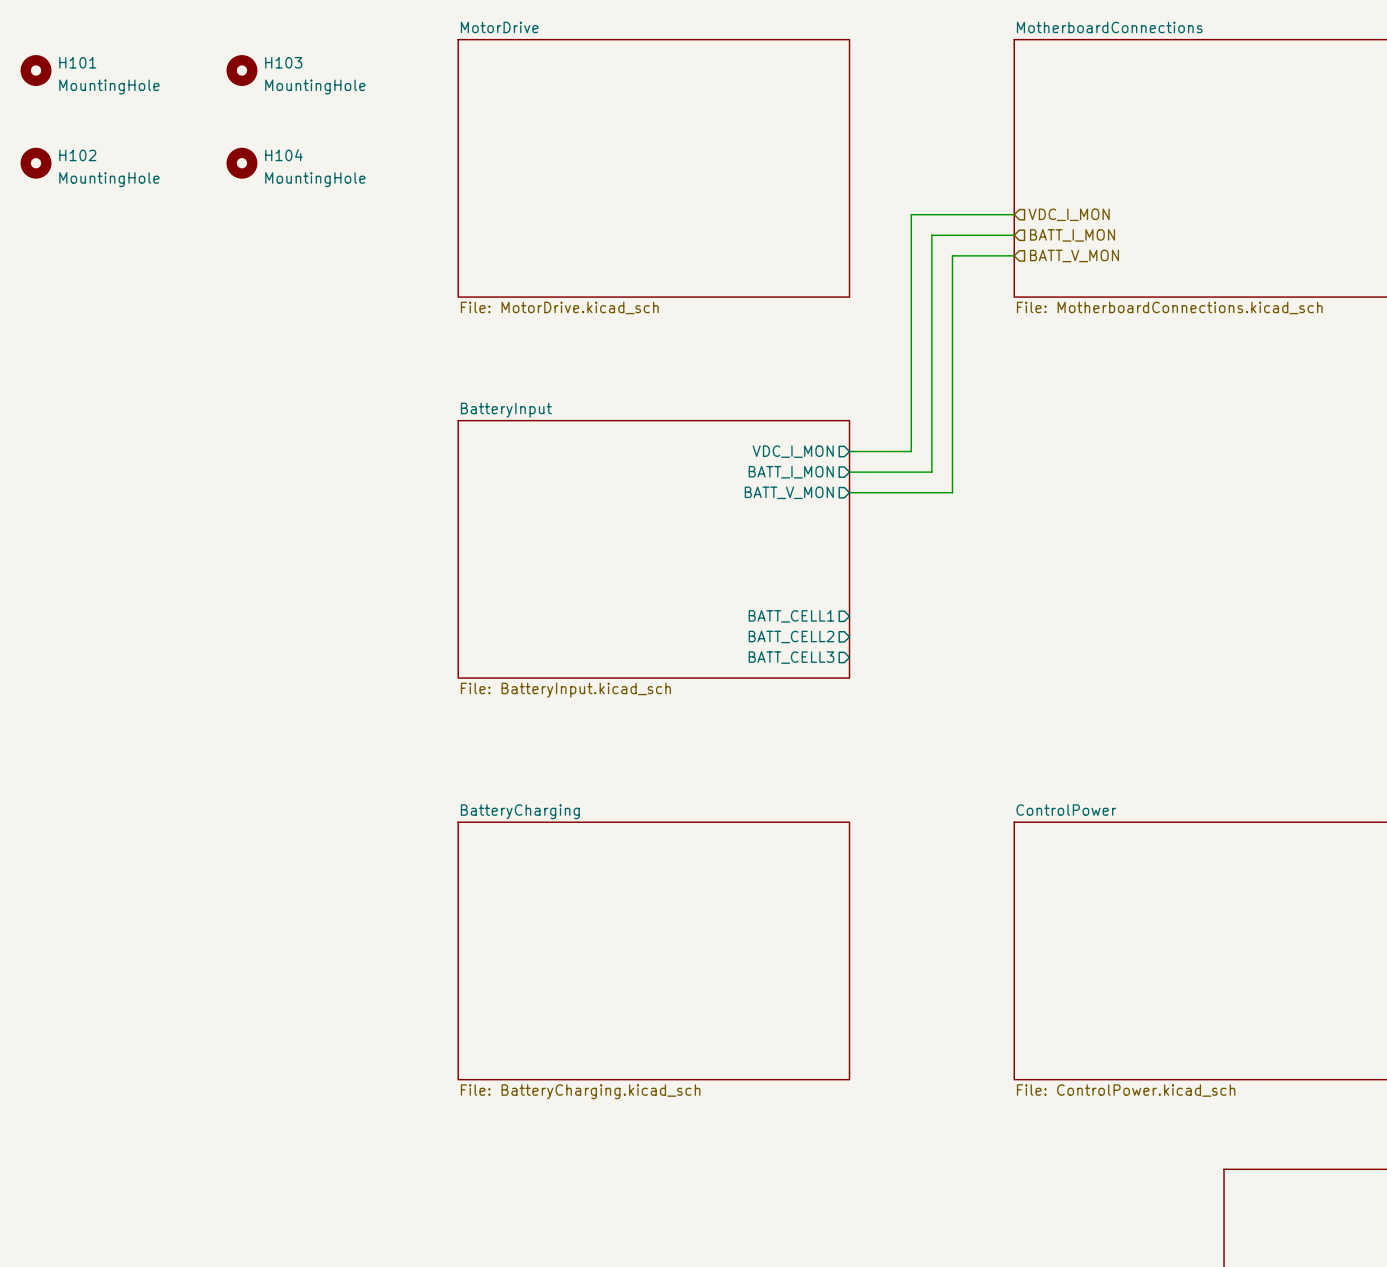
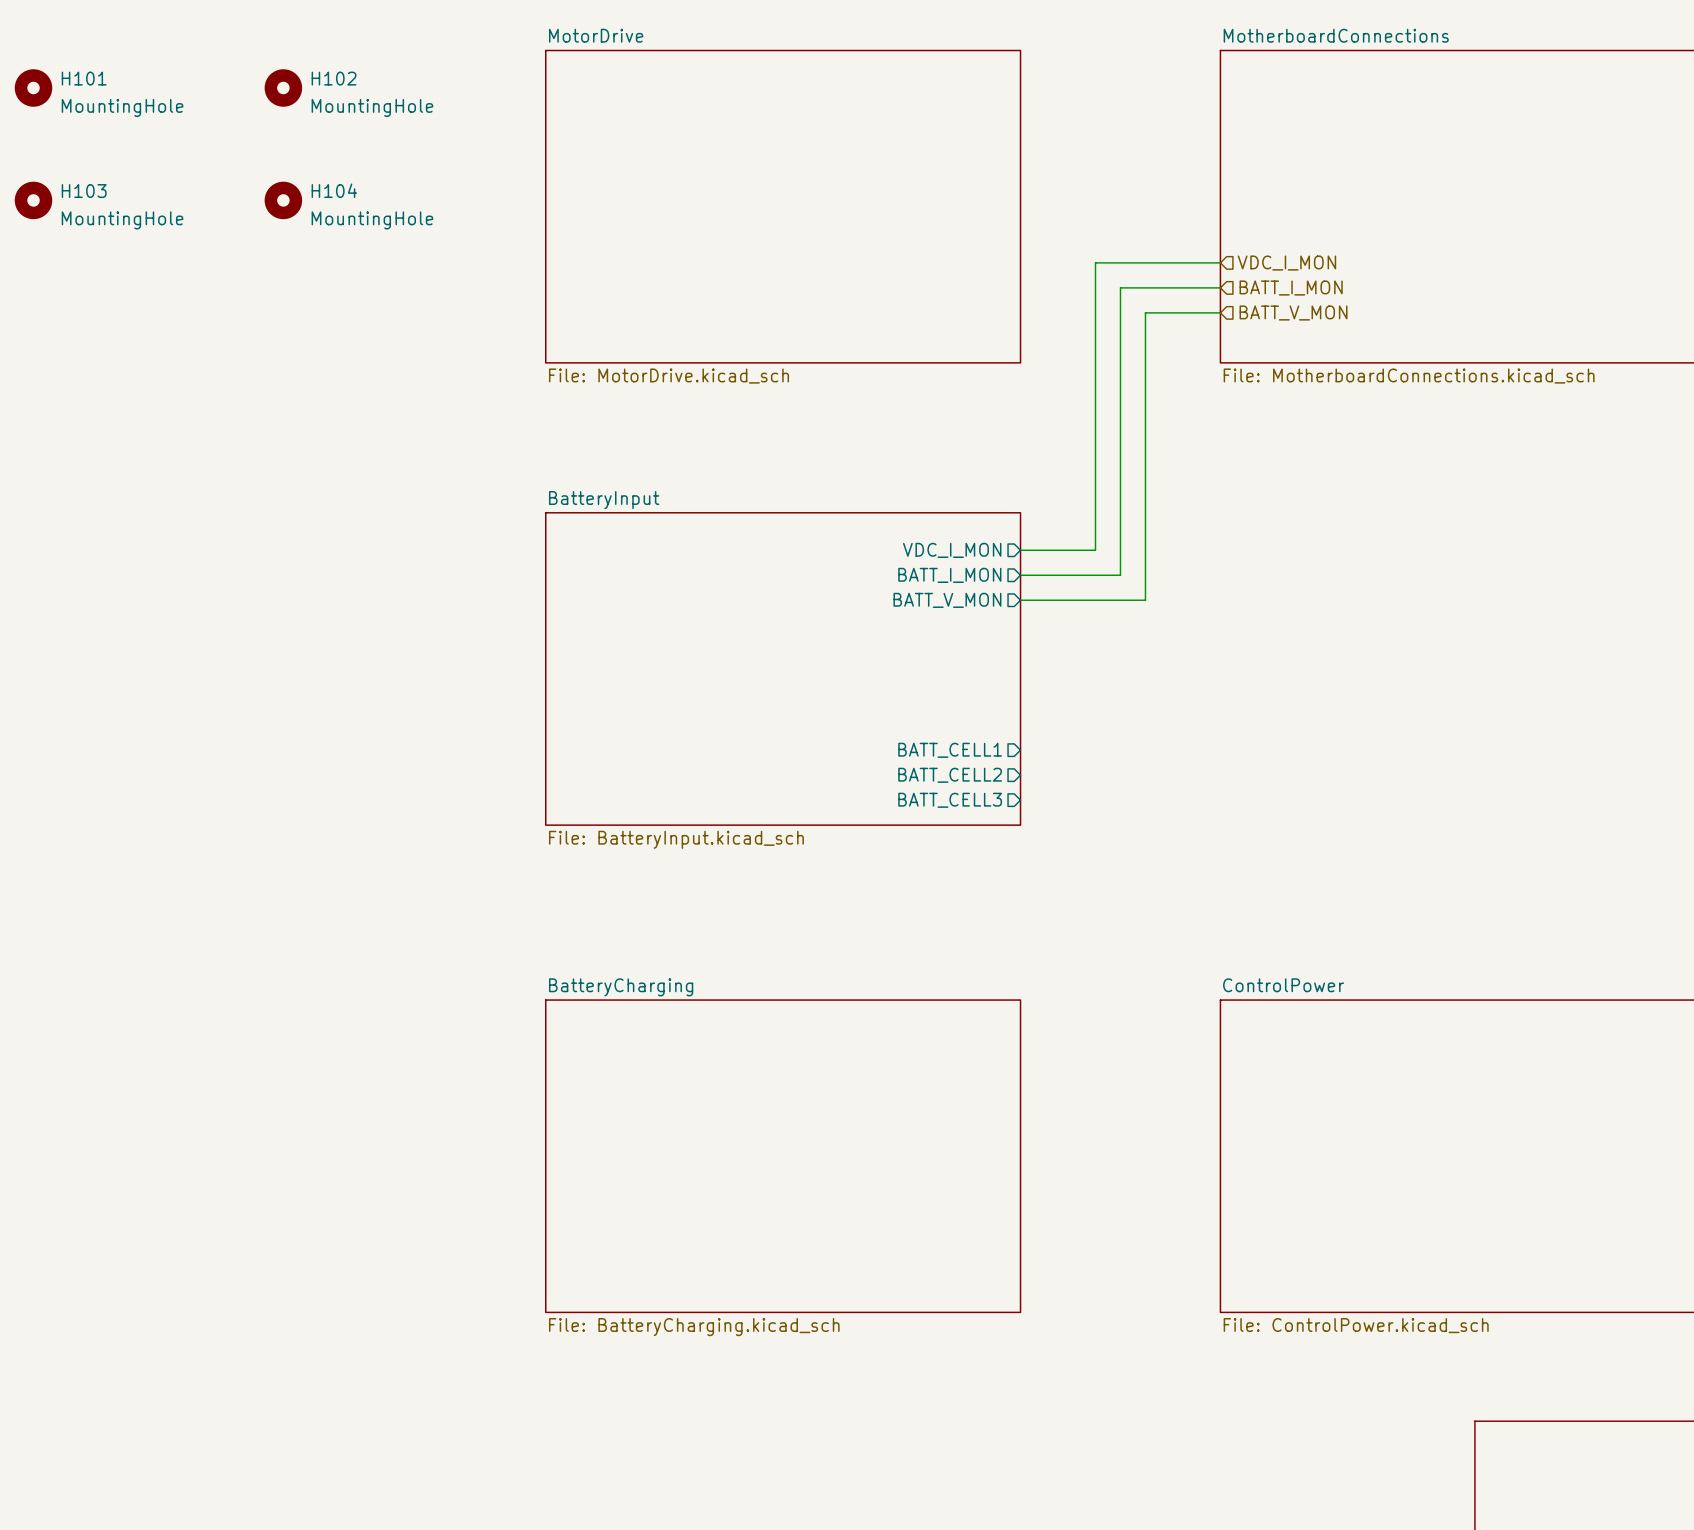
H103 name: H103 (283, 62) -> H102 (334, 78)
H102 name: H102 (77, 155) -> H103 (84, 191)

